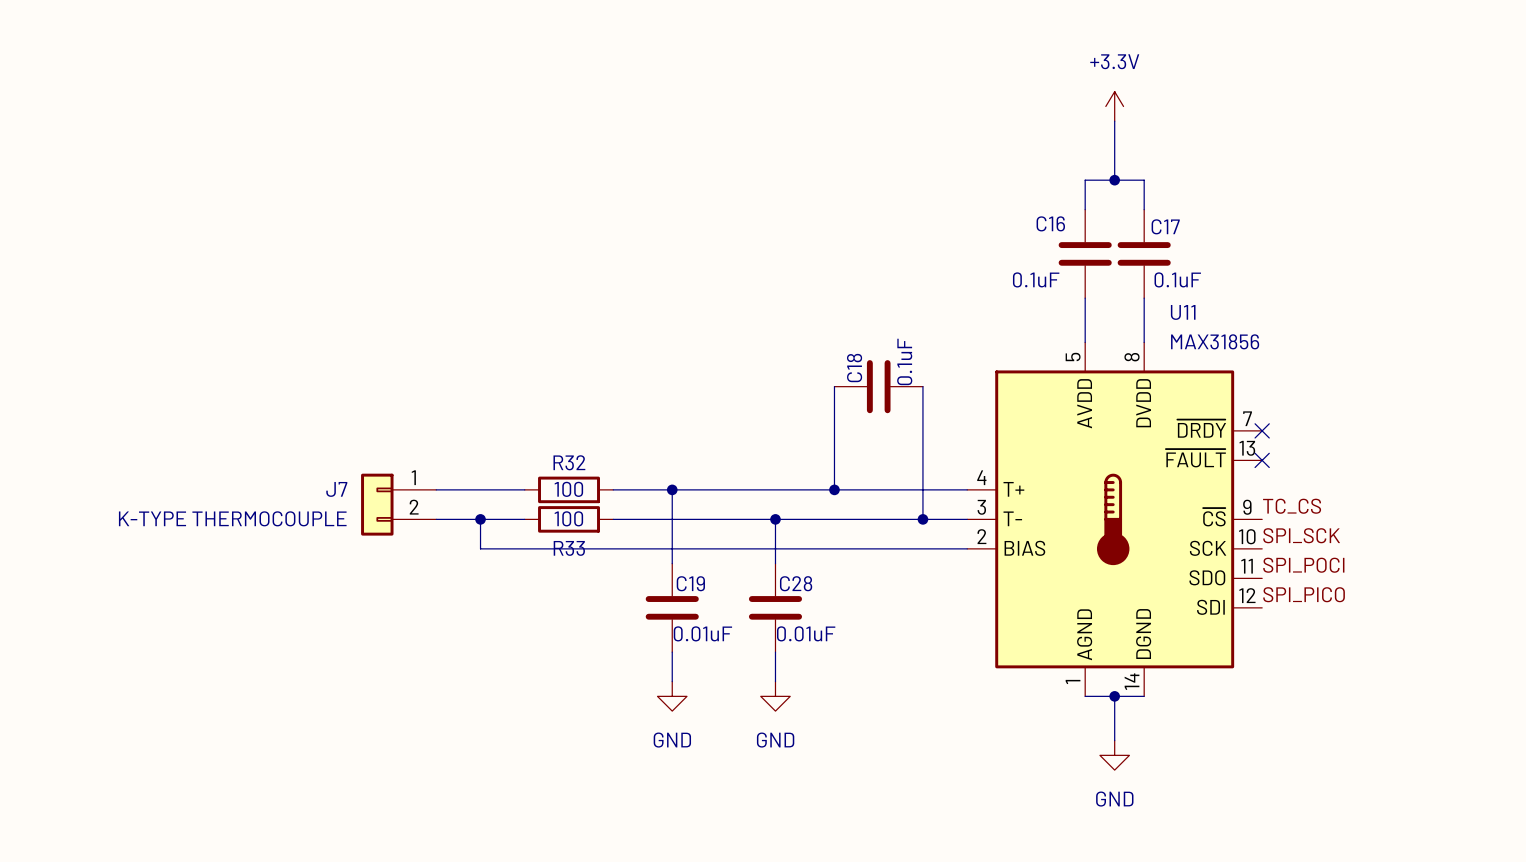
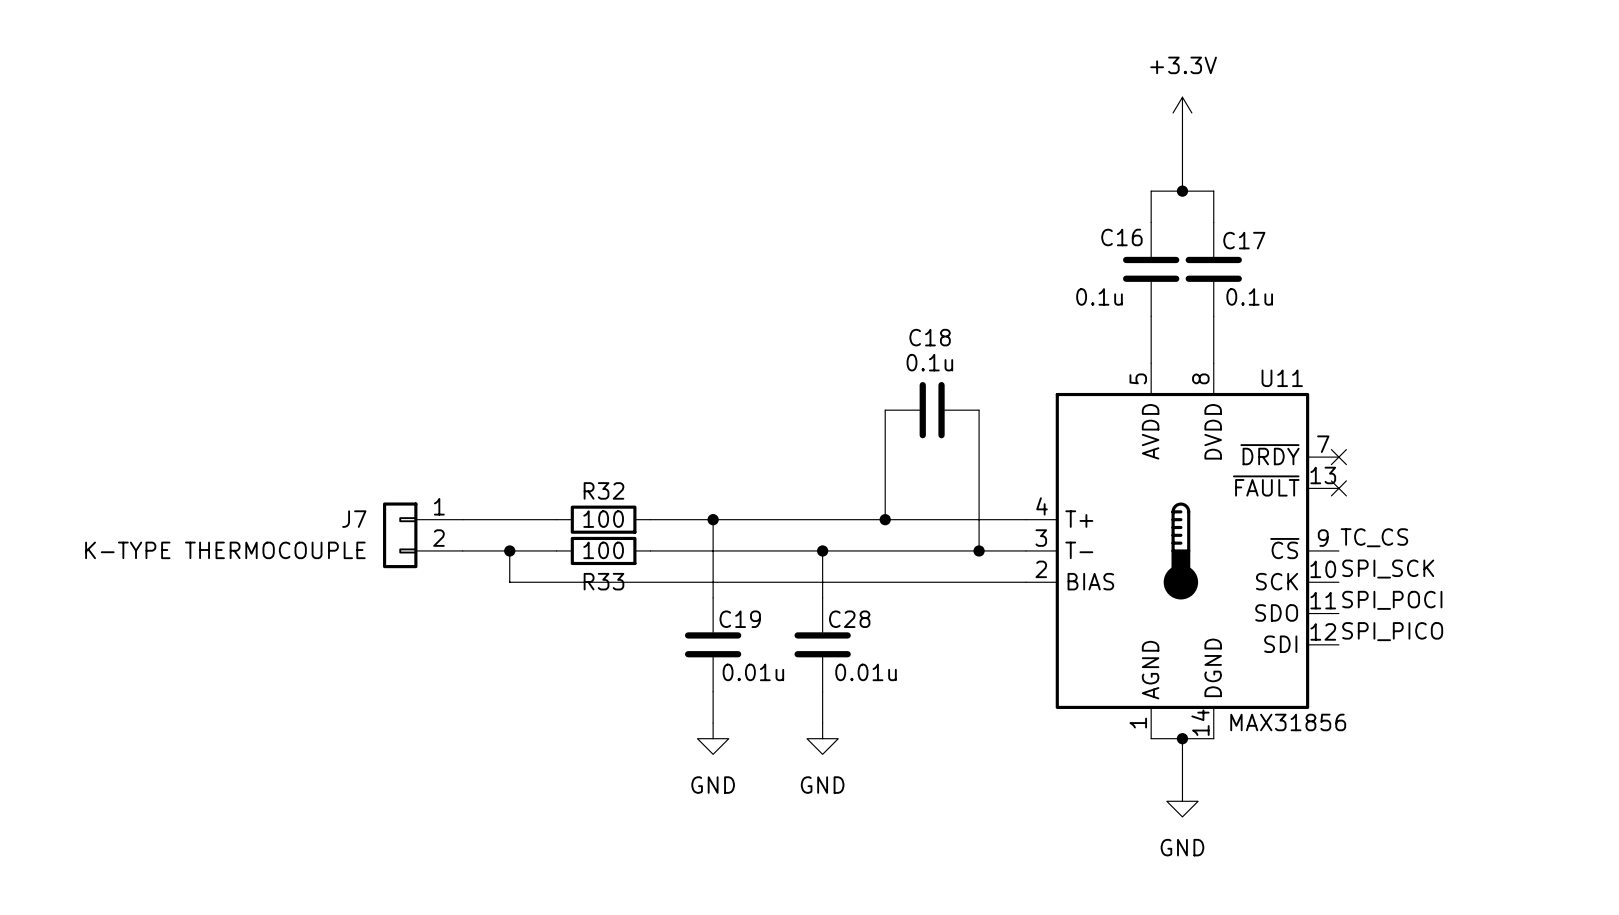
C16 value: 0.1uF (1036, 279) -> 0.1u (1099, 296)
C17 value: 0.1uF (1177, 279) -> 0.1u (1249, 296)
U11 name position: U11 (1183, 312) -> U11 (1282, 378)
U11 value position: MAX31856 (1215, 341) -> MAX31856 (1288, 722)
C18 value: 0.1uF (904, 361) -> 0.1u (929, 362)
C18 name rotation: 0° (854, 368) -> 90° clockwise (930, 337)
C19 value: 0.01uF (702, 633) -> 0.01u (753, 672)
C28 value: 0.01uF (806, 633) -> 0.01u (866, 672)

